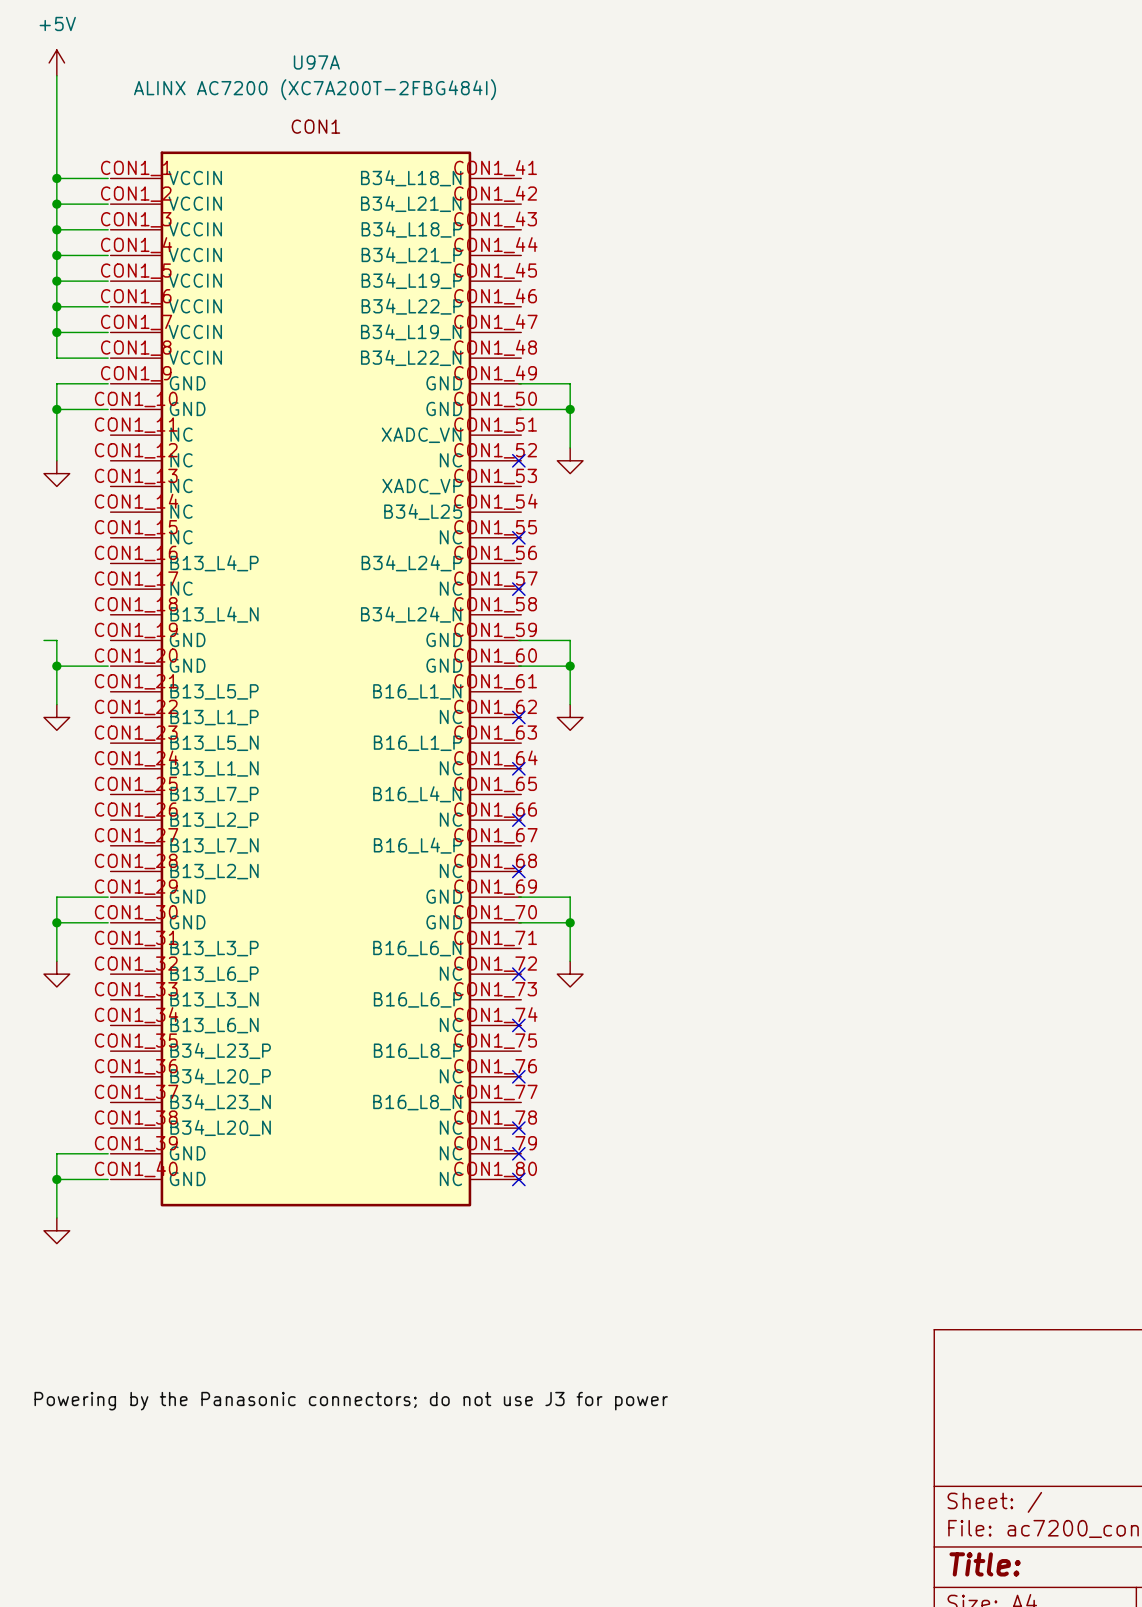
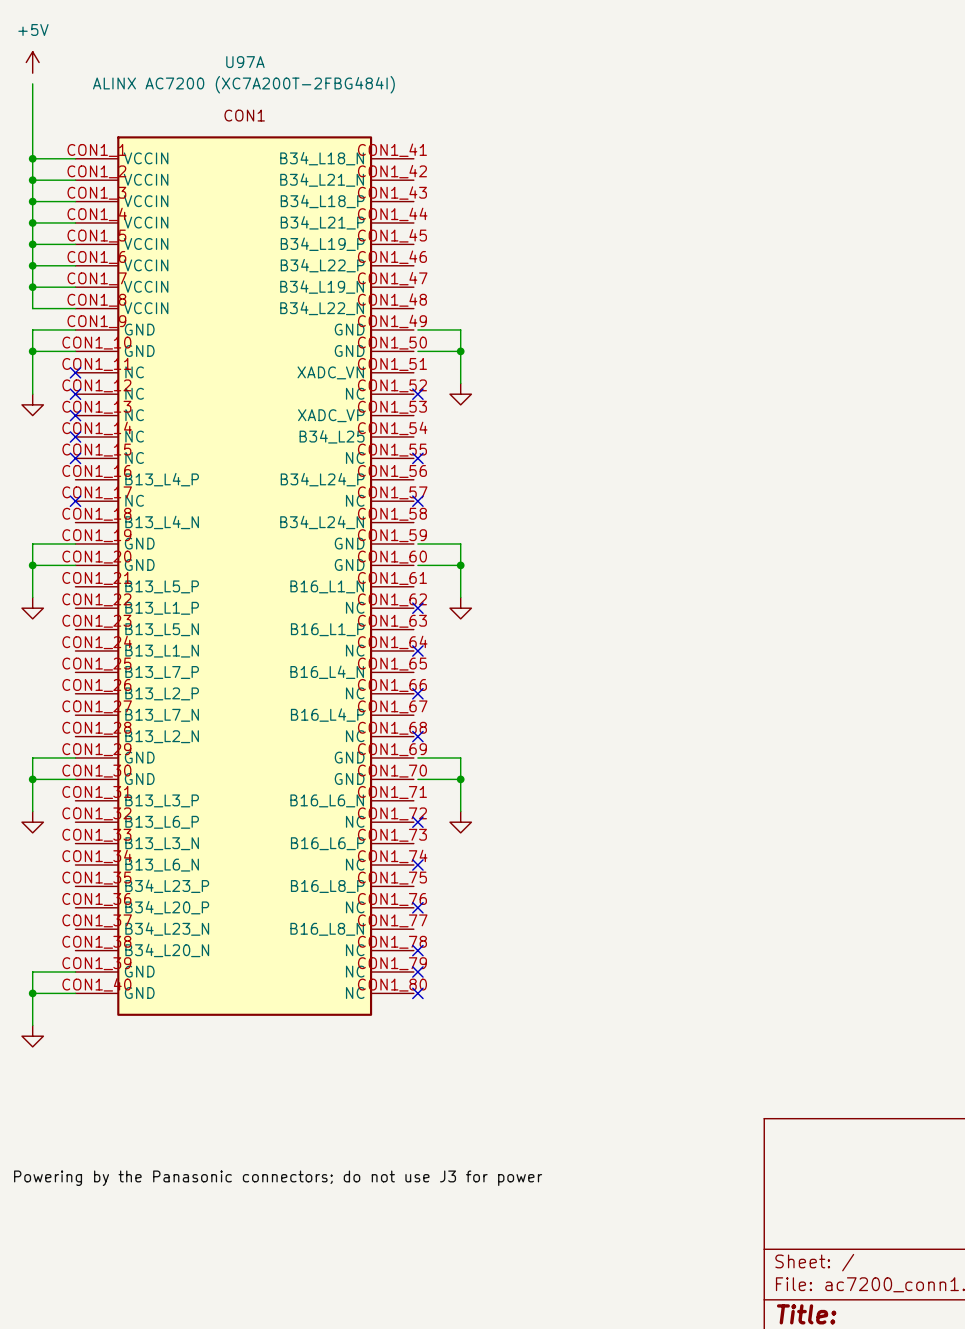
wire: (56, 75) (56, 88) -> none
U97A symbol: [110, 151, 522, 1207] -> [75, 136, 414, 1016]
no-connect mark: none -> (75, 372)
no-connect mark: none -> (75, 394)
no-connect mark: none -> (75, 415)
no-connect mark: none -> (75, 436)
no-connect mark: none -> (75, 458)
no-connect mark: none -> (75, 501)
wire: (44, 640) (56, 640) -> (75, 543) (32, 543)

